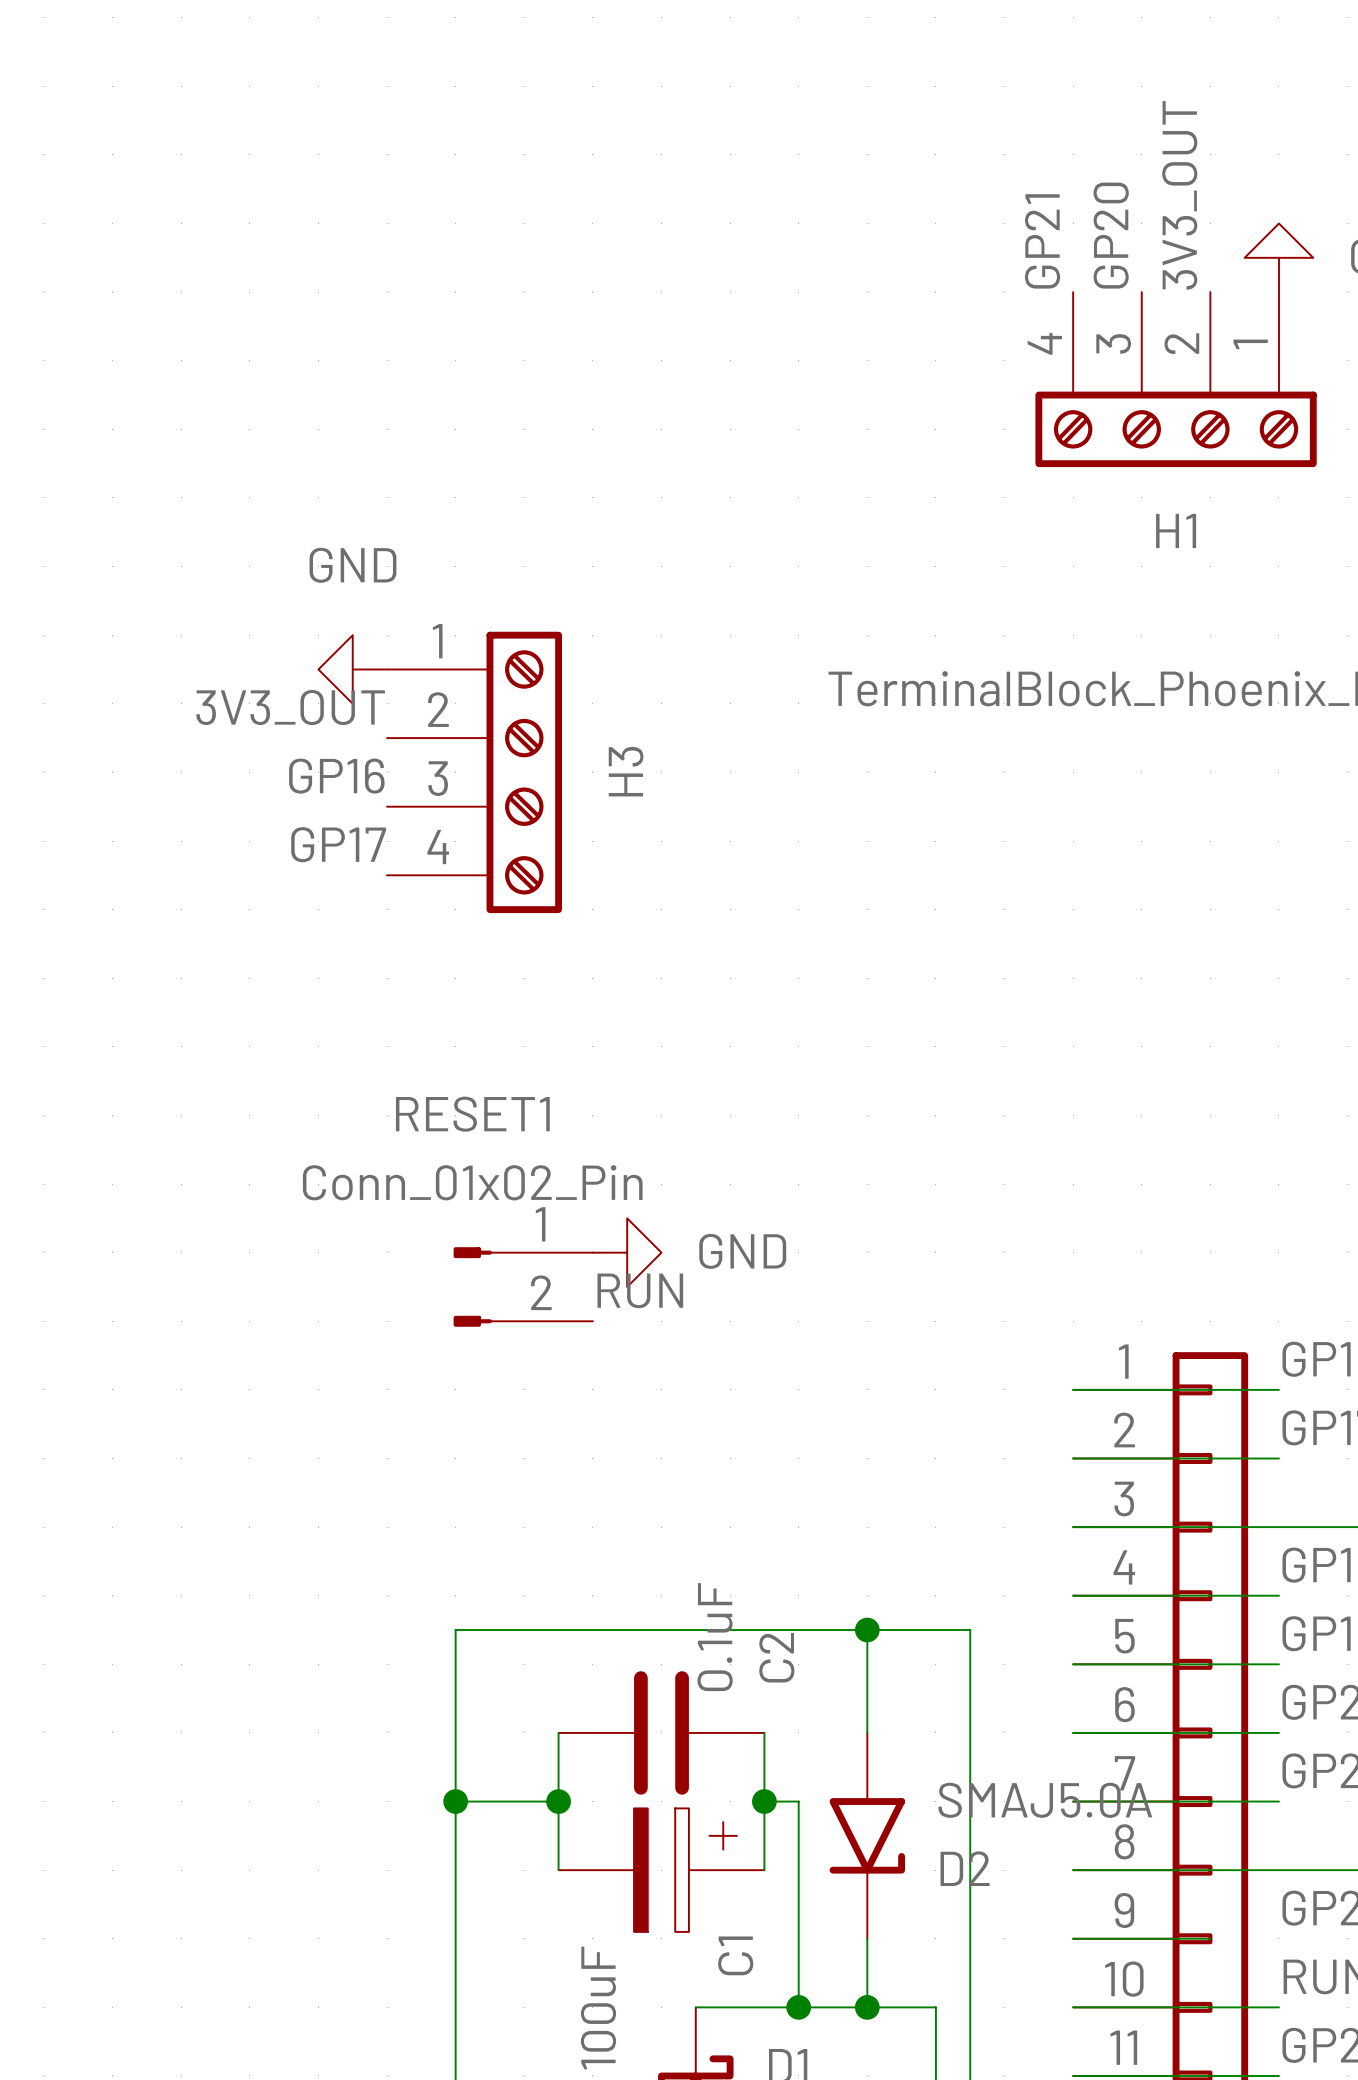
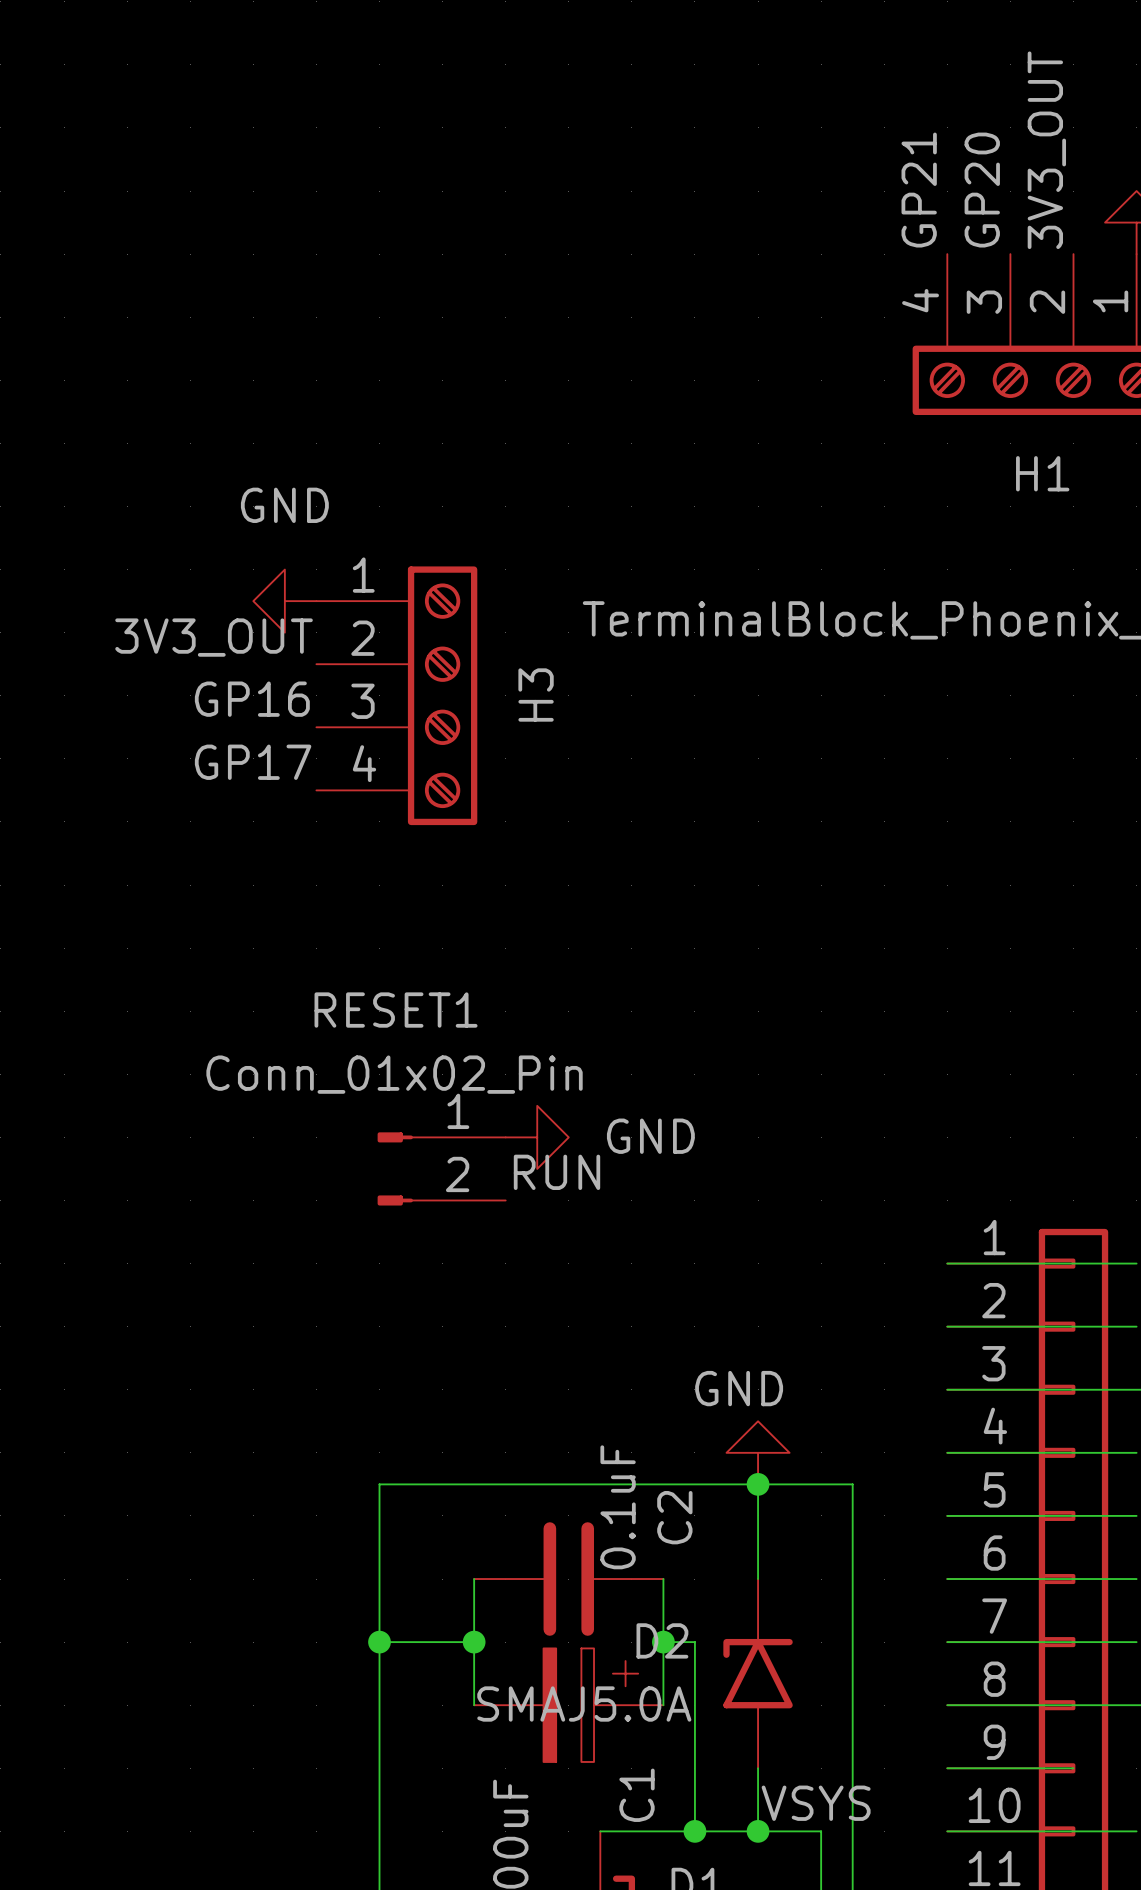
power symbol: none -> GND (758, 1452)
D2 rotation: 0° (867, 1835) -> 180° (758, 1673)
label: none -> VSYS (816, 1803)

